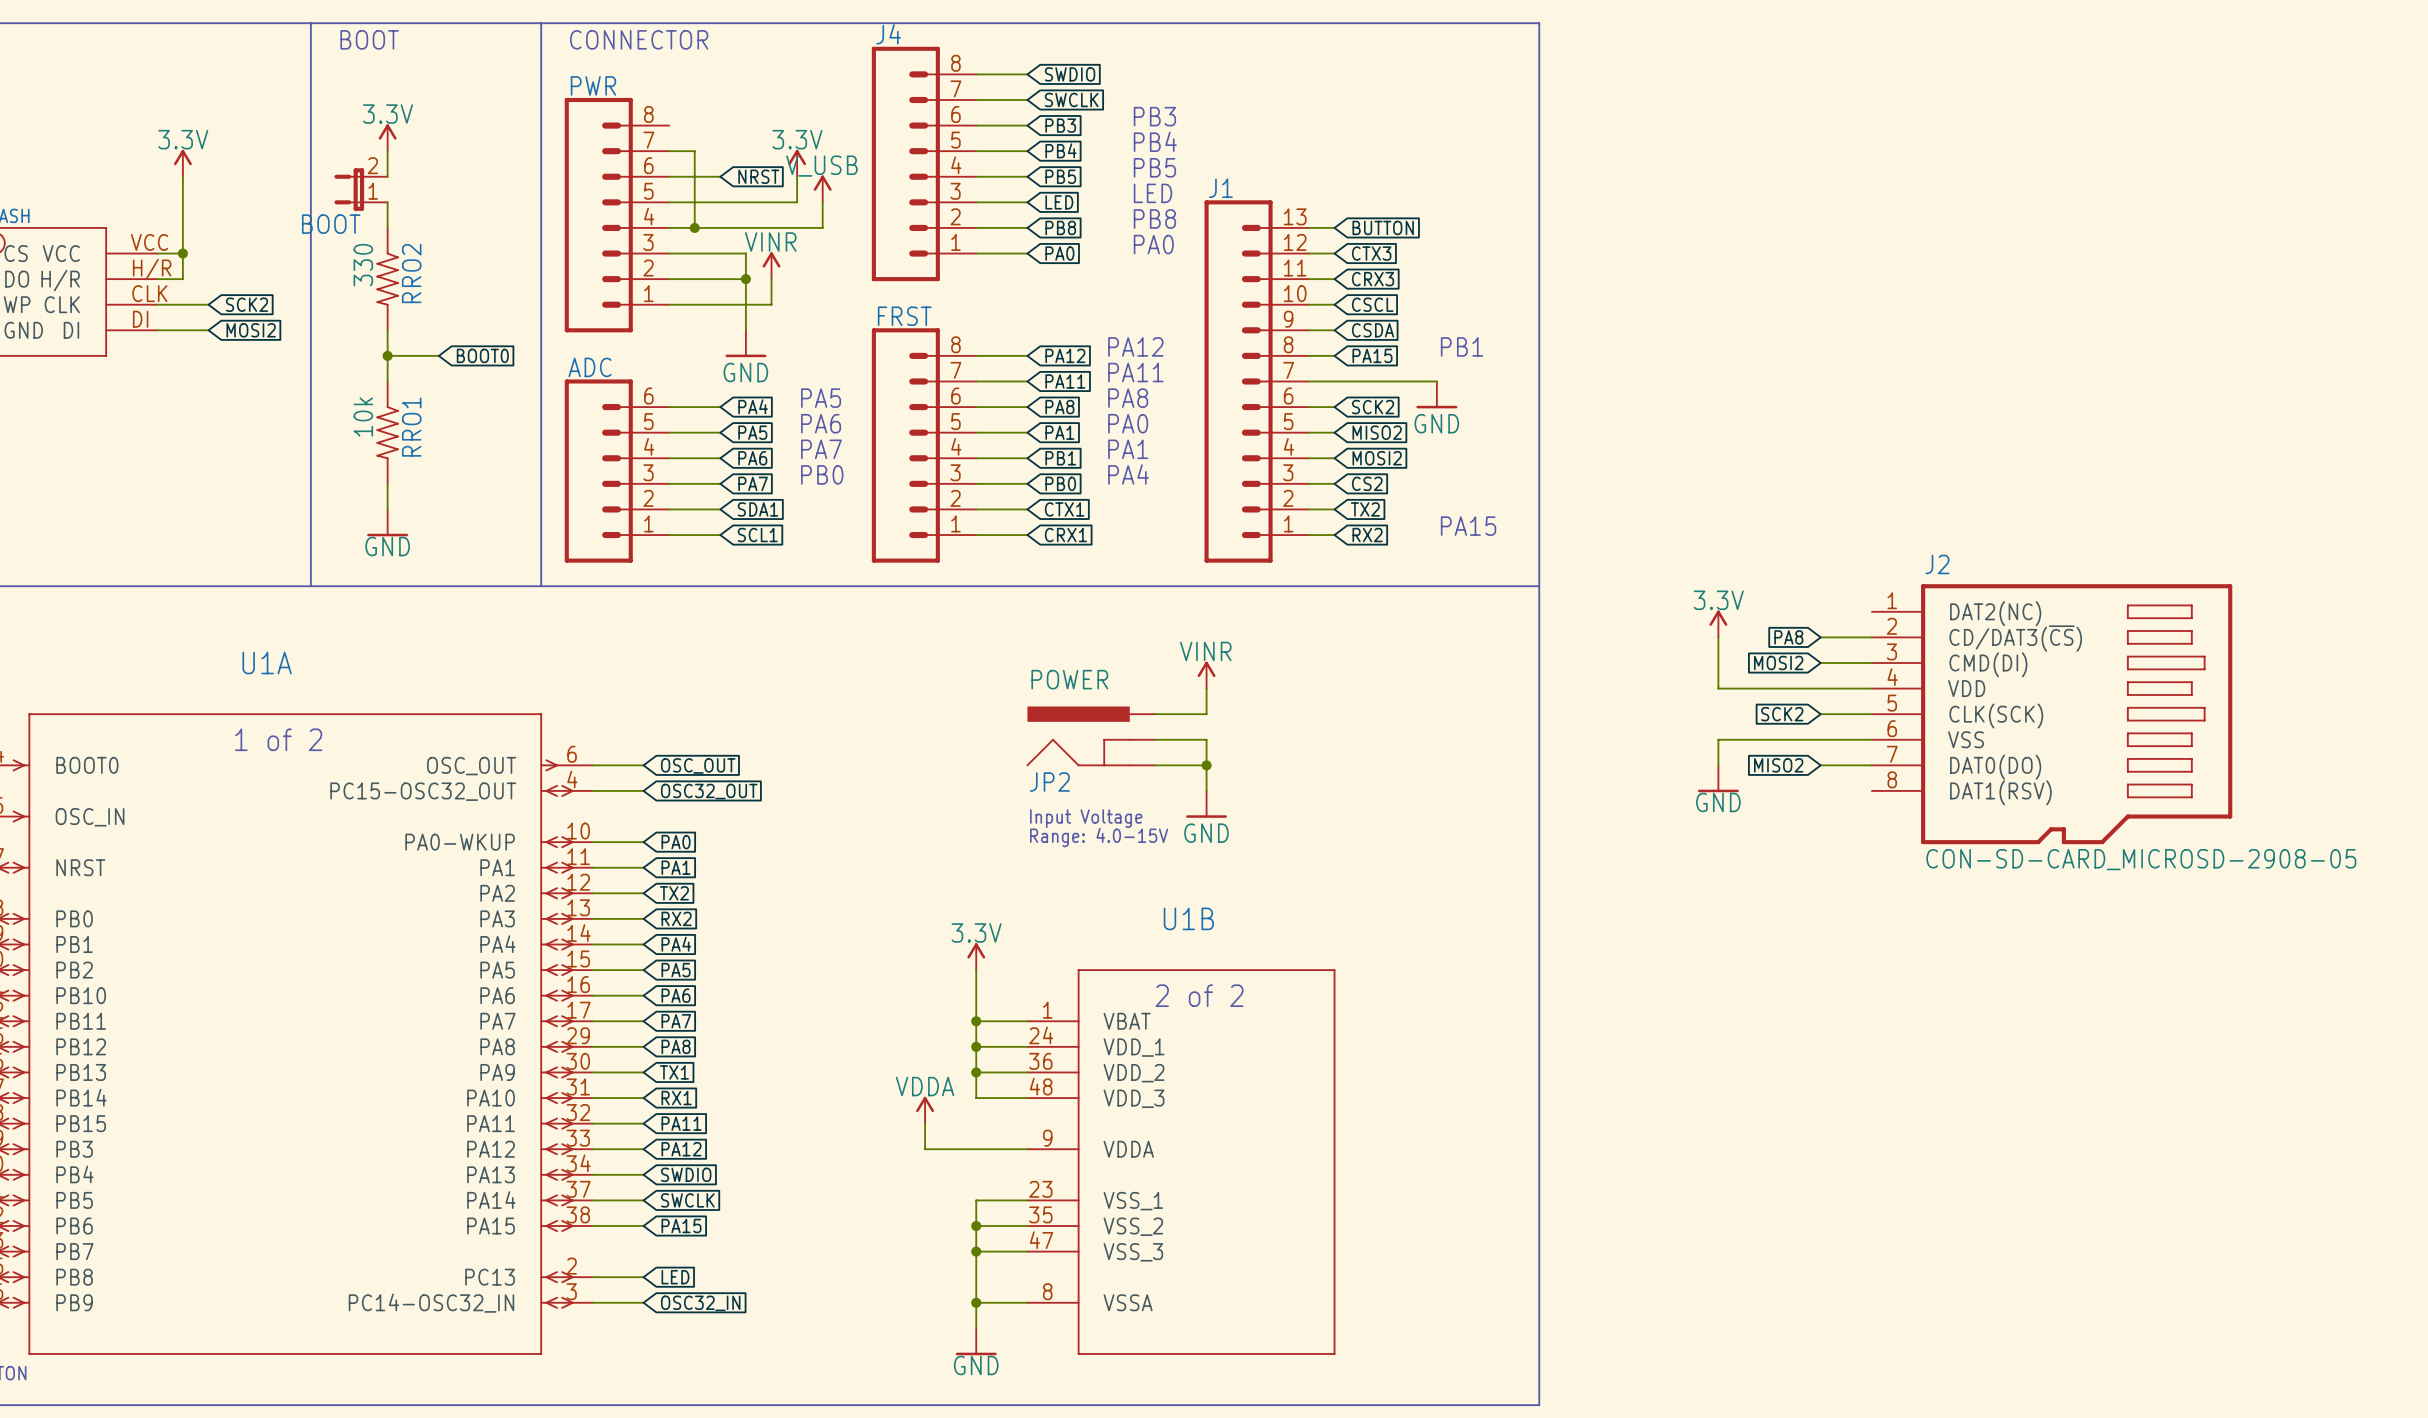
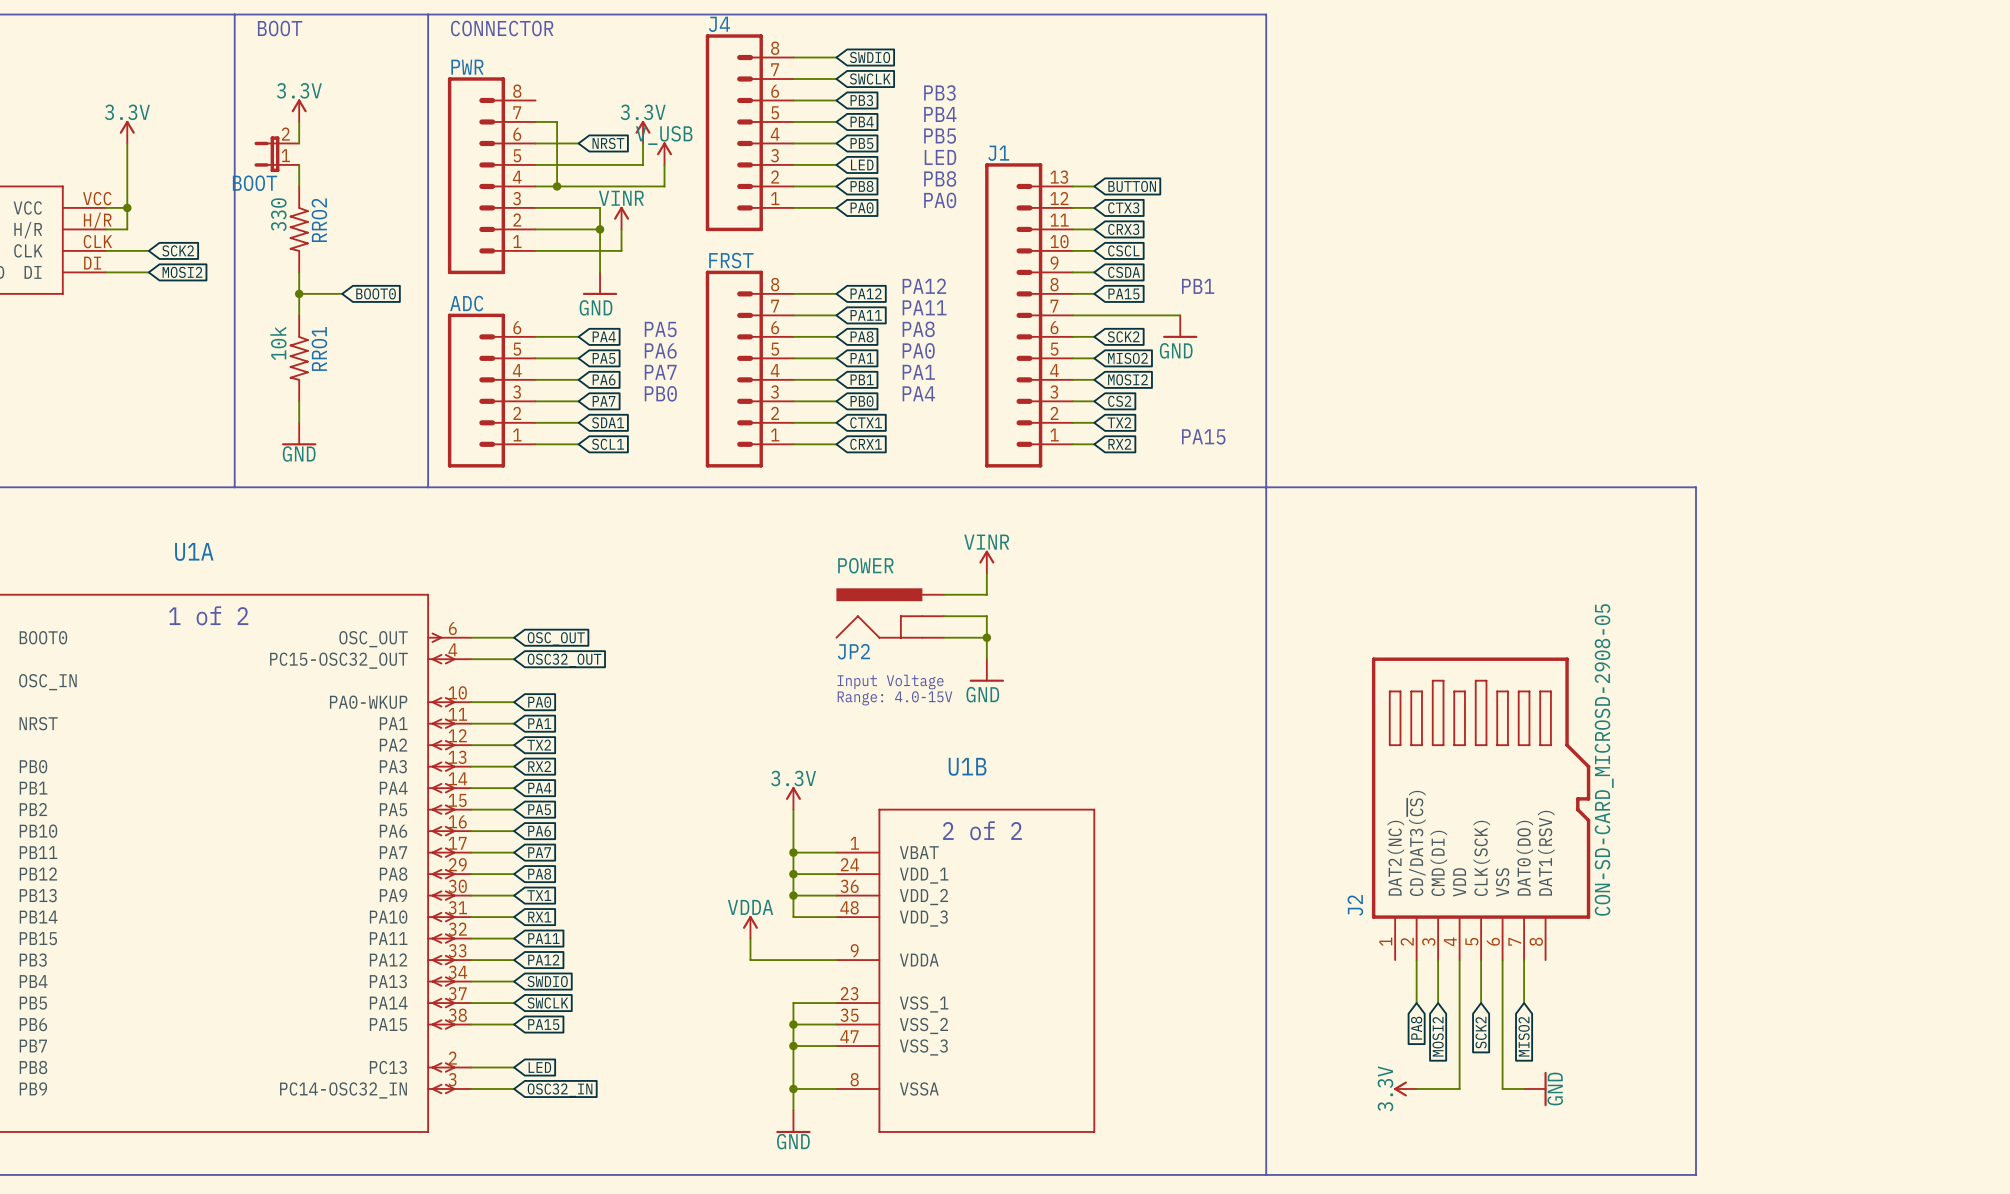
line: none -> (1266, 487) (1695, 487) (1695, 1174) (1266, 1174)
power symbol: 3.3V (1718, 623) -> none
wire: (1718, 637) (1718, 688) (1871, 688) -> none
global label: PA8 (1788, 637) -> none
wire: (1820, 637) (1871, 637) -> none
global label: MOSI2 (1778, 662) -> none
wire: (1820, 662) (1871, 662) -> none
global label: SCK2 (1782, 714) -> none
wire: (1820, 714) (1871, 714) -> none
J2 position: (2052, 714) -> (1481, 808)
J2 rotation: 0° (2076, 714) -> 90° counterclockwise (1481, 788)
wire: (1871, 739) (1718, 739) (1718, 765) -> none
global label: MISO2 (1778, 765) -> none
wire: (1820, 765) (1871, 765) -> none
power symbol: GND (1718, 778) -> none
wire: none -> (1416, 960) (1416, 1003)
wire: none -> (1438, 960) (1438, 1003)
wire: none -> (1459, 960) (1459, 1088) (1416, 1088)
wire: none -> (1481, 960) (1481, 1003)
wire: none -> (1502, 960) (1502, 1088) (1524, 1088)
wire: none -> (1524, 960) (1524, 1003)
global label: none -> PA8 (1416, 1028)
global label: none -> SCK2 (1481, 1032)
global label: none -> MOSI2 (1438, 1036)
global label: none -> MISO2 (1524, 1036)
power symbol: none -> 3.3V (1405, 1088)
power symbol: none -> GND (1535, 1088)

